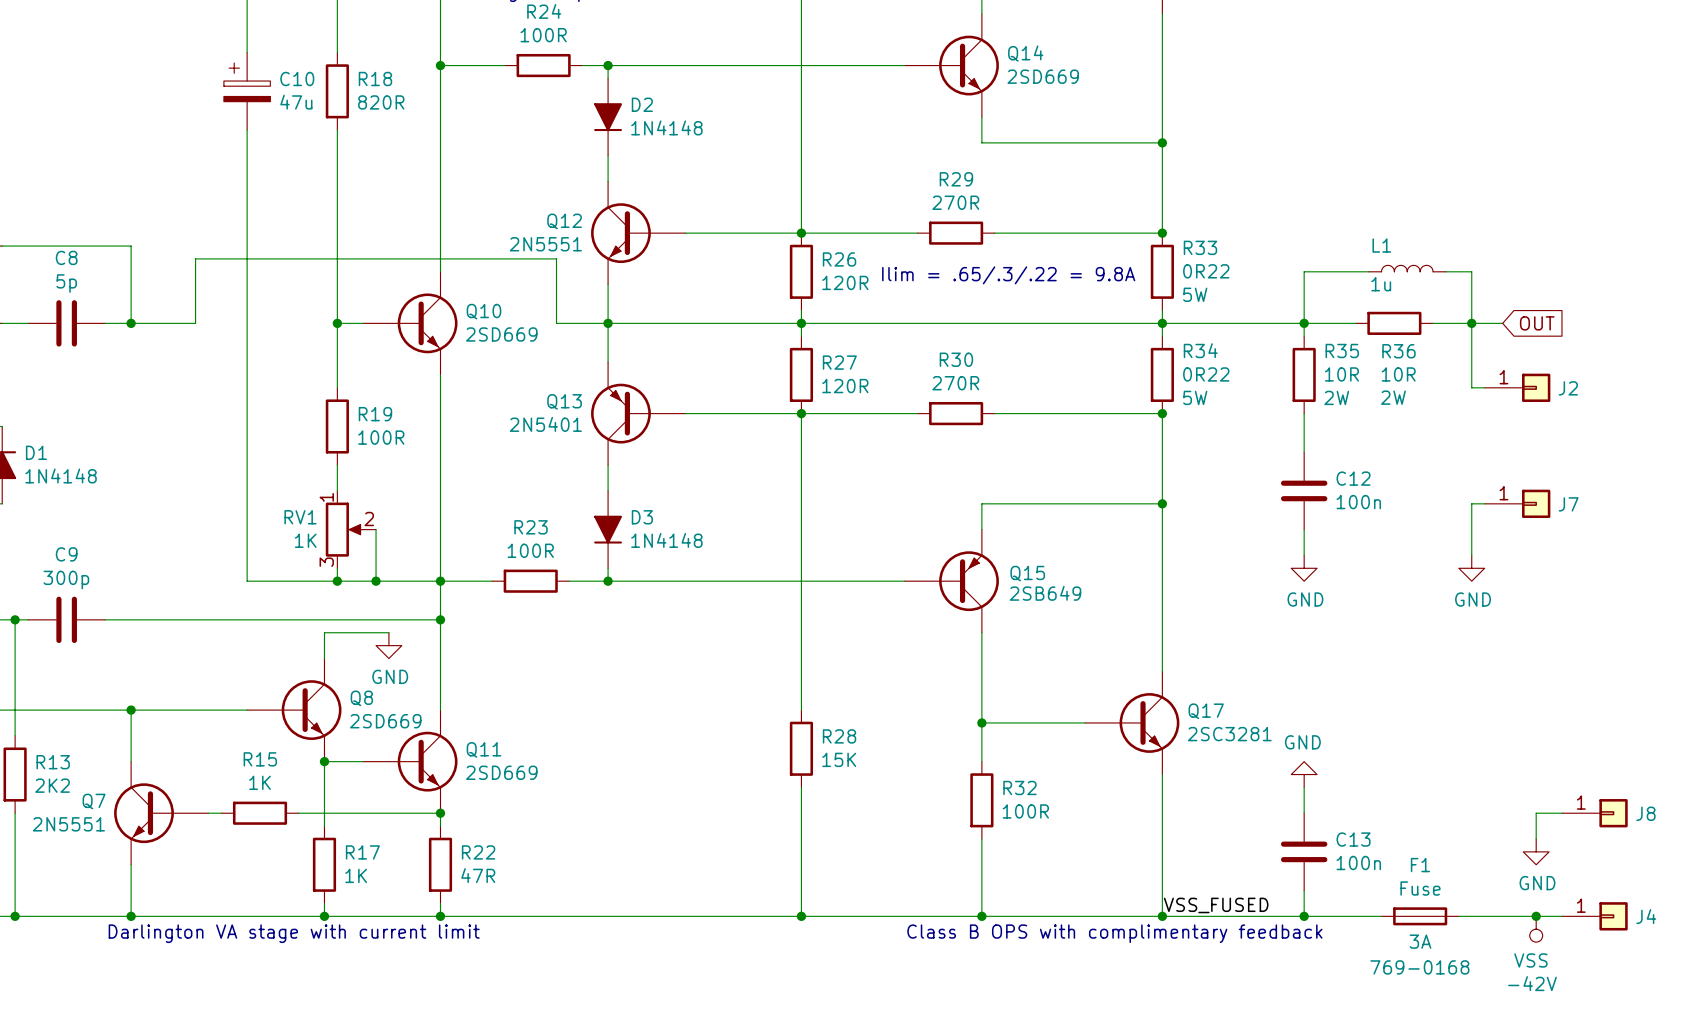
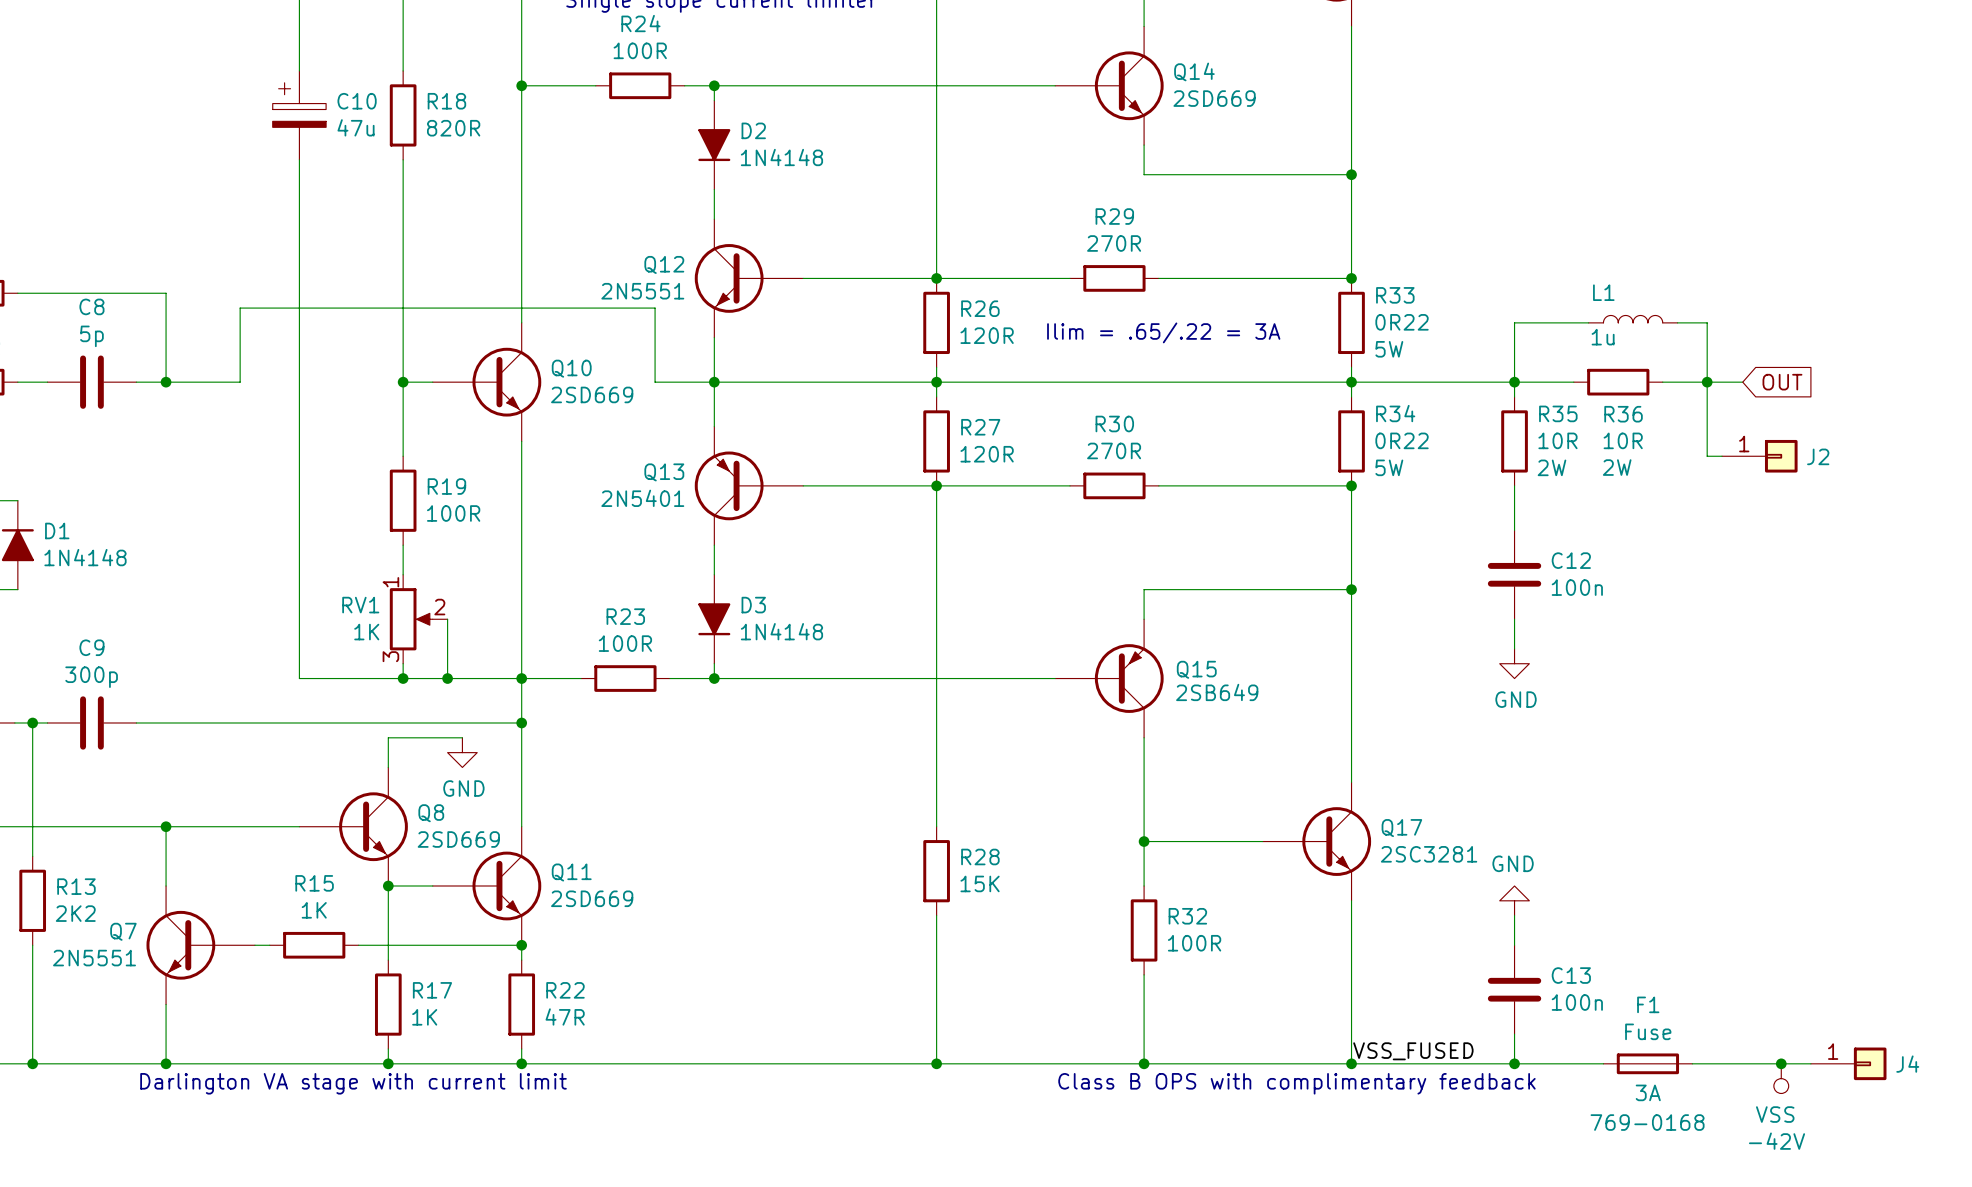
text: Ilim = .65/.3/.22 = 9.8A (1008, 275) -> Ilim = .65/.22 = 3A (1163, 332)
wire: (1484, 503) (1471, 503) (1471, 555) -> none
J7: (1517, 503) -> none
power symbol: GND (1471, 568) -> none
wire: (1561, 813) (1536, 813) (1536, 839) -> none
J8: (1594, 813) -> none
power symbol: GND (1536, 851) -> none

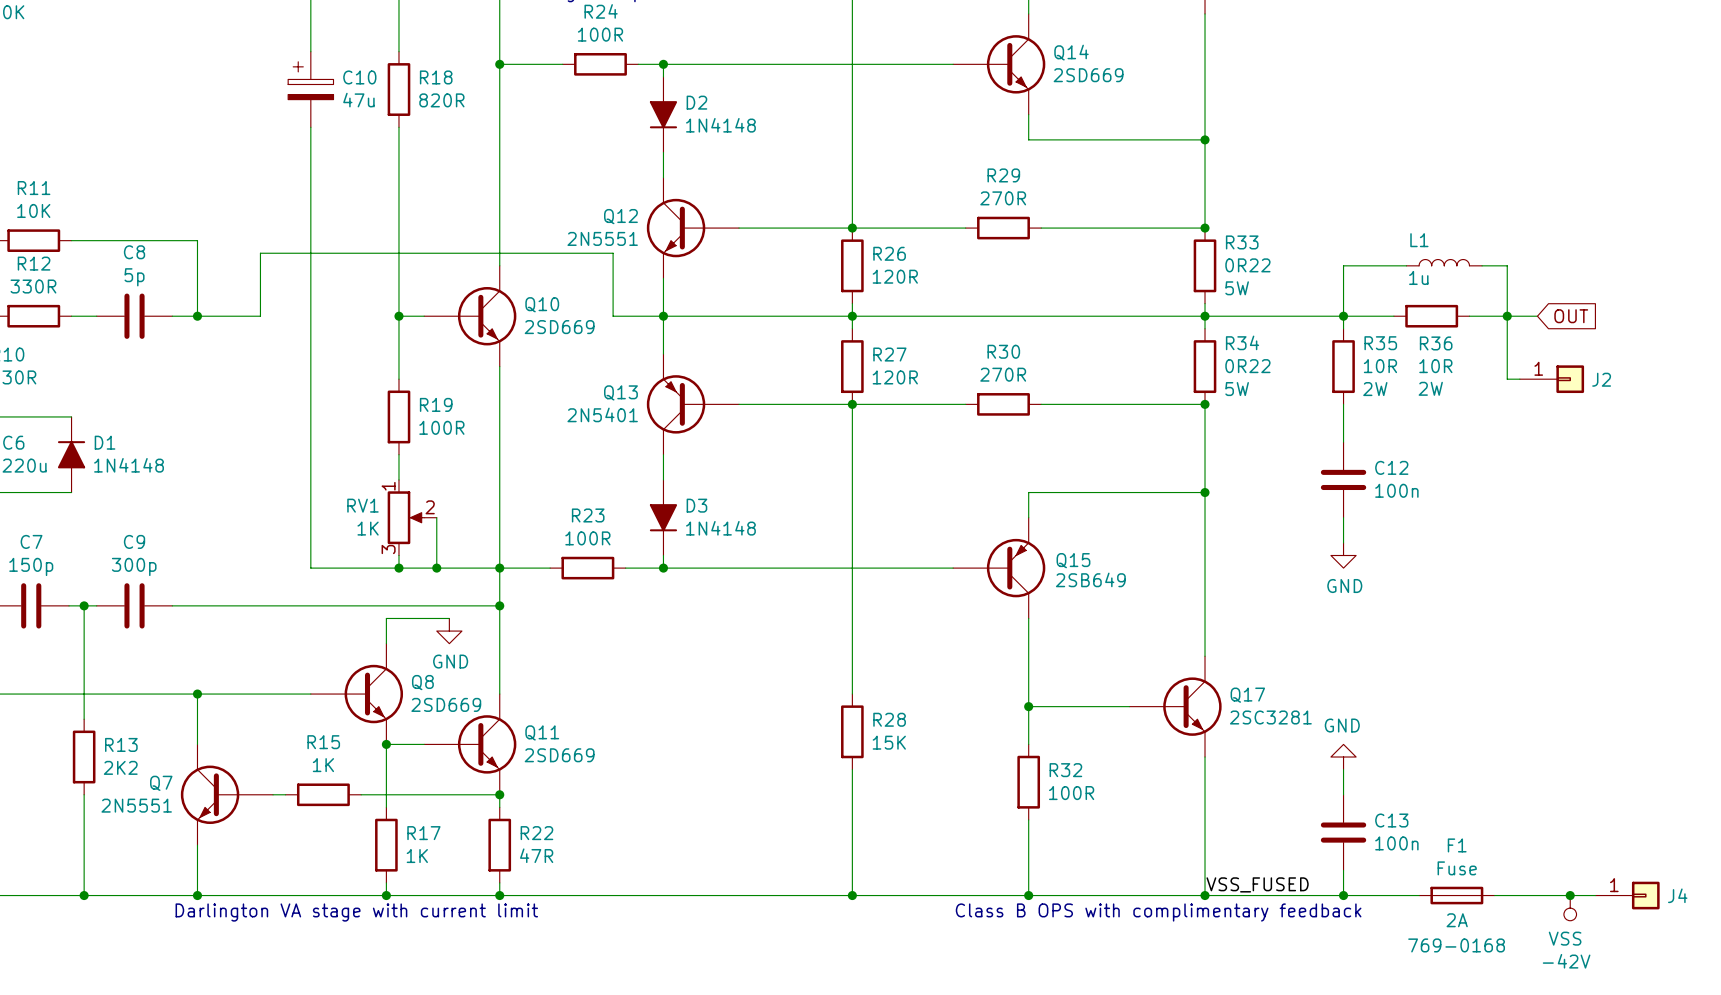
text: Ilim = .65/.22 = 3A (1163, 332) -> none
F1 text: 3A (1648, 1092) -> 2A (1457, 920)

